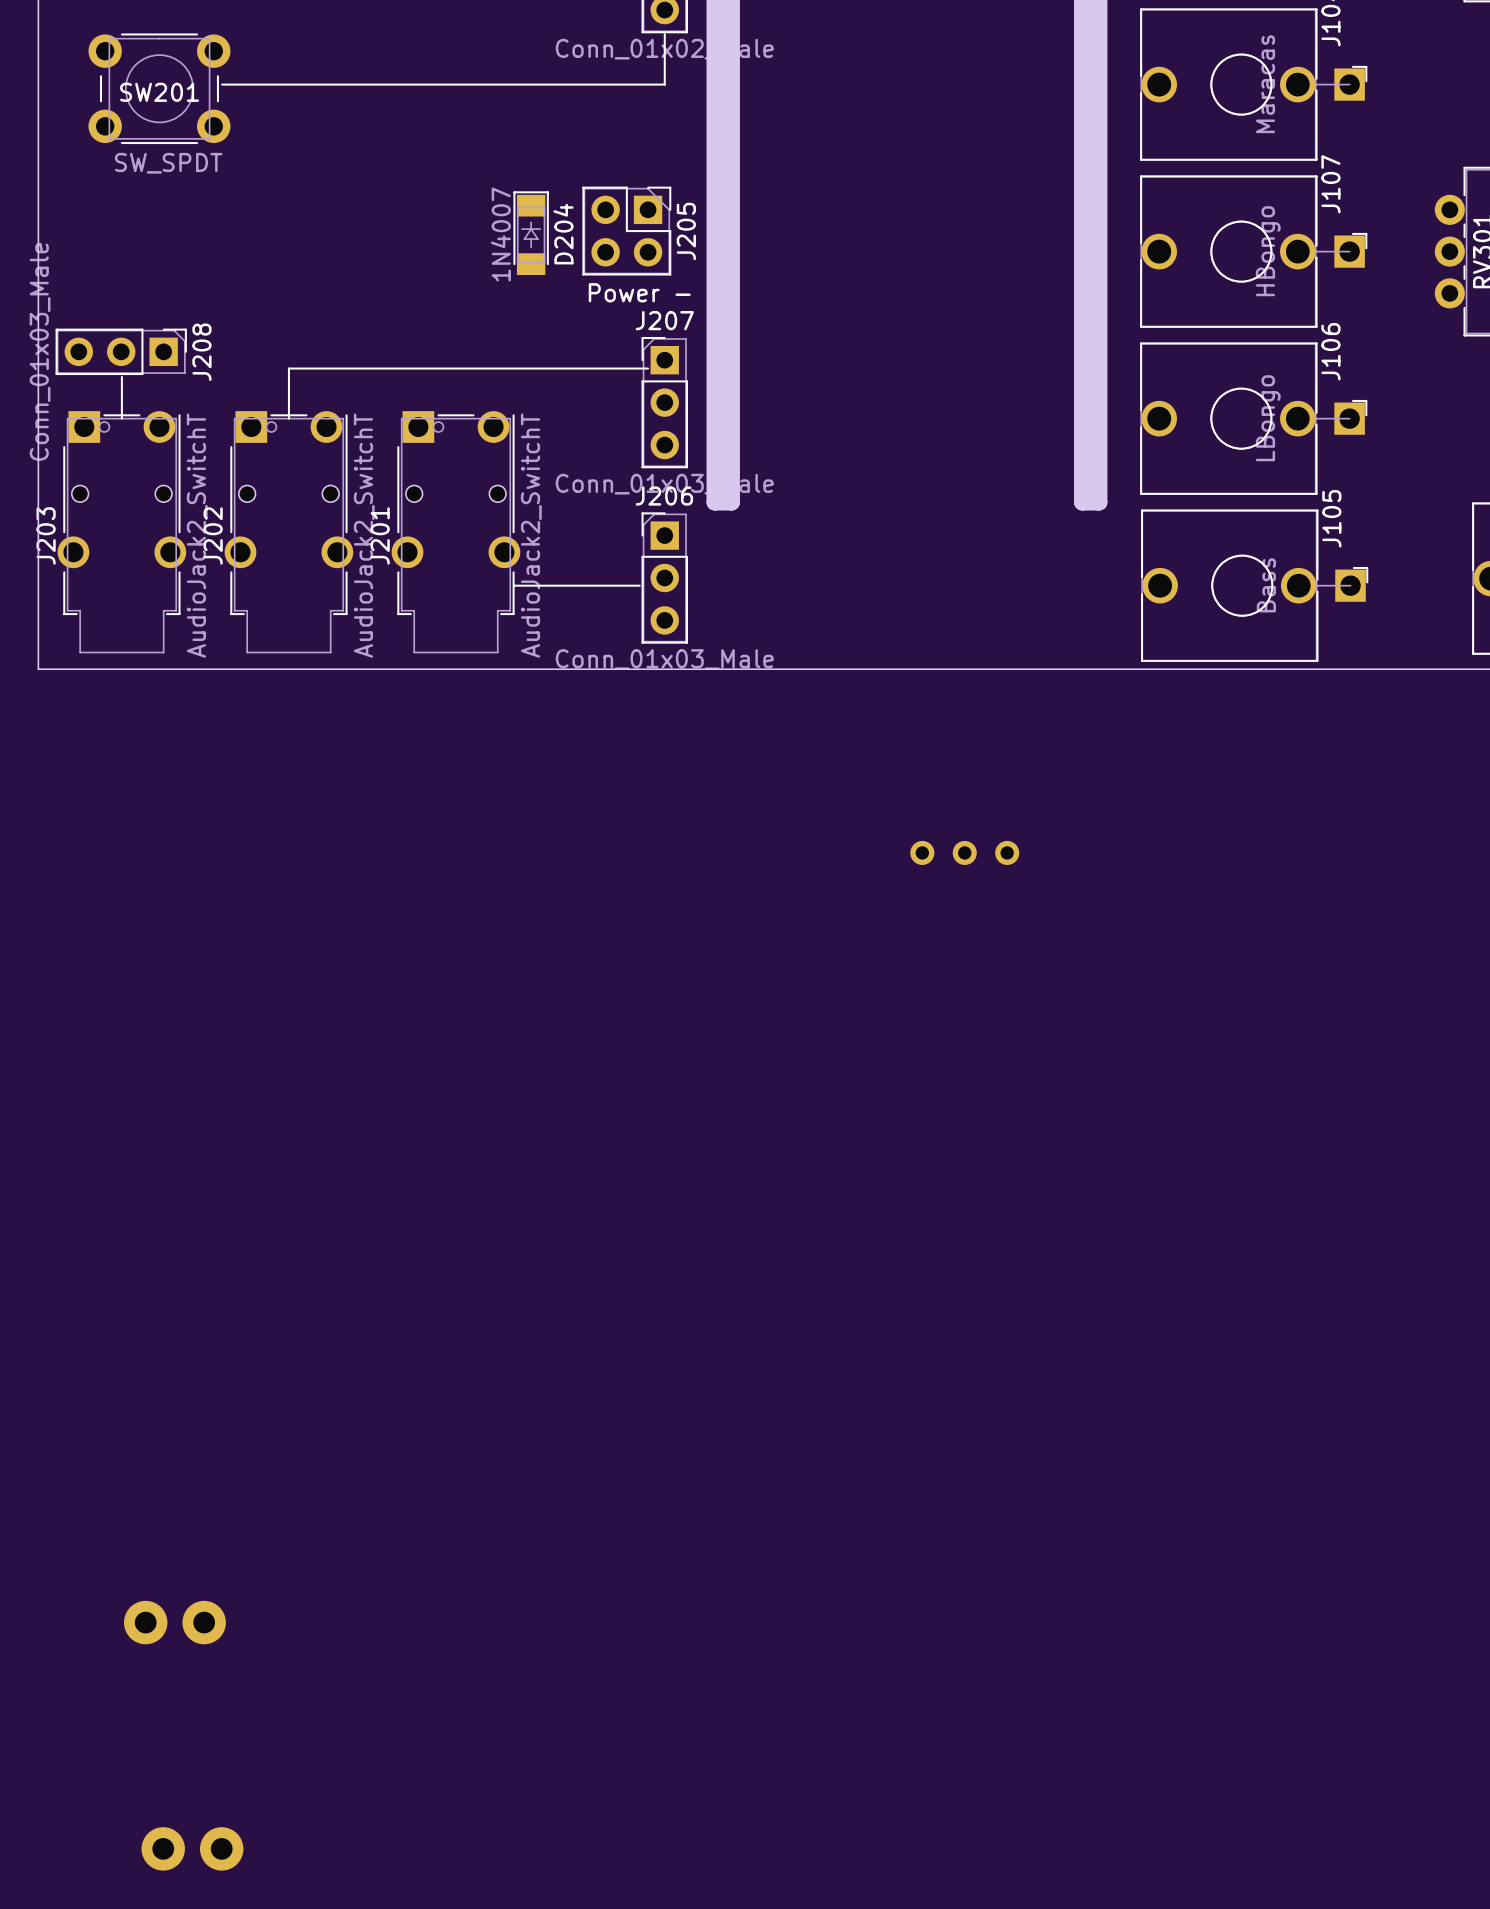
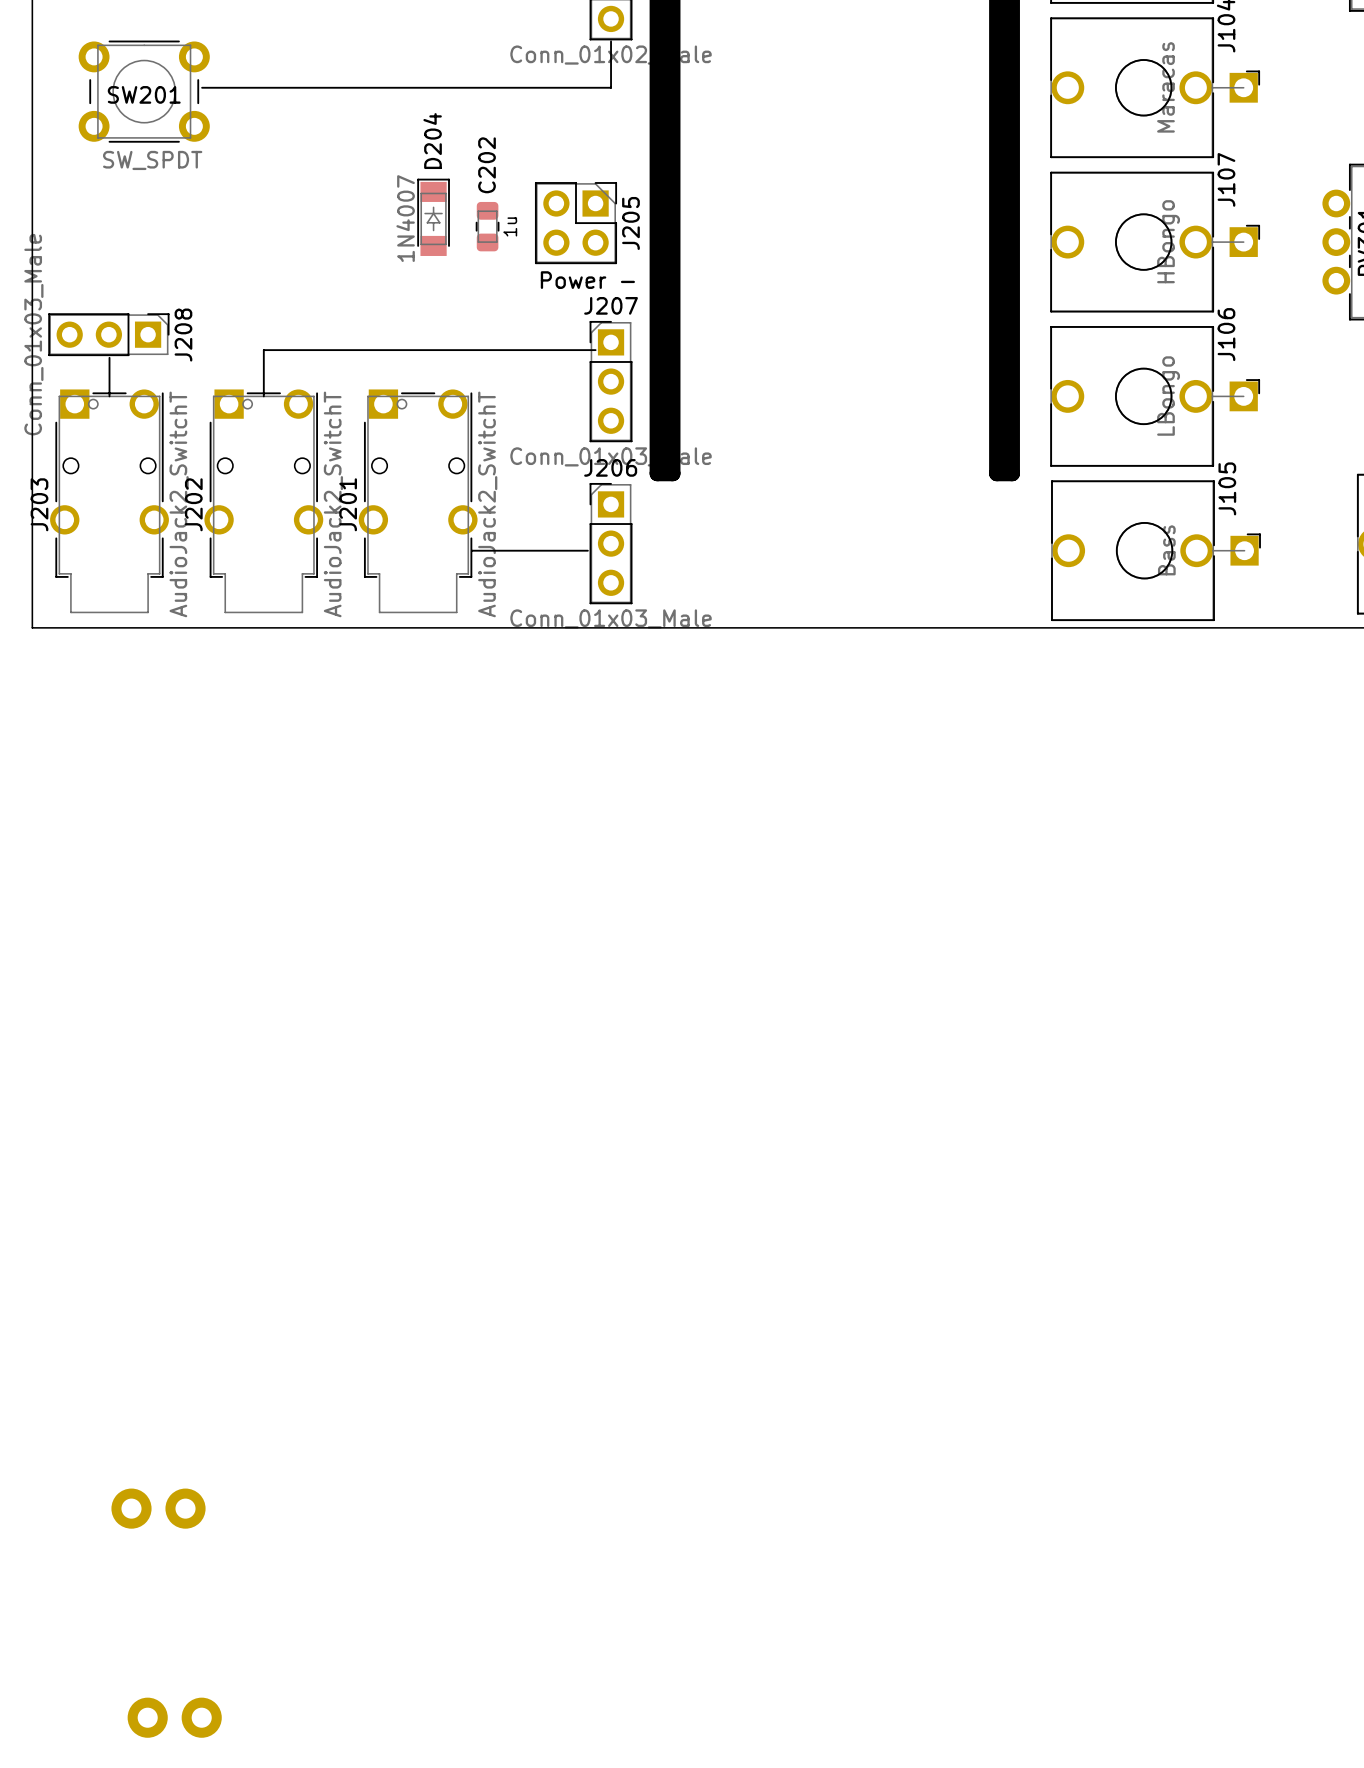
D204 position: (531, 233) -> (433, 217)
C202: none -> 1u (487, 226)
D204 name position: D204 (563, 234) -> D204 (432, 141)
part: (964, 852) -> none

